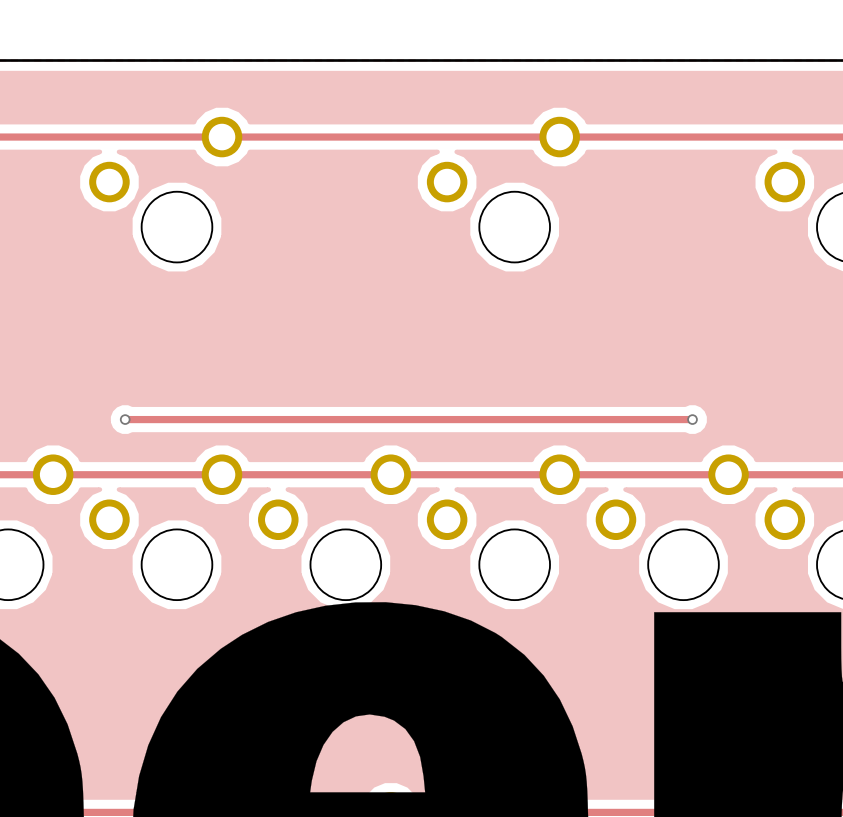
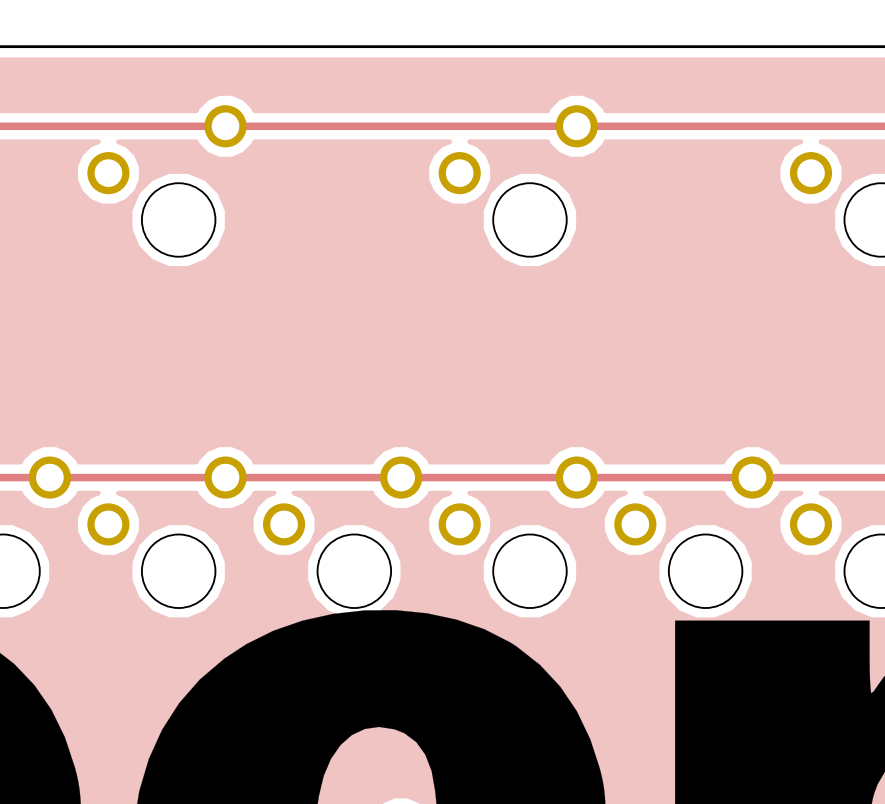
track: (125, 419) (692, 419) -> none
via: (125, 419) -> none
via: (692, 419) -> none

